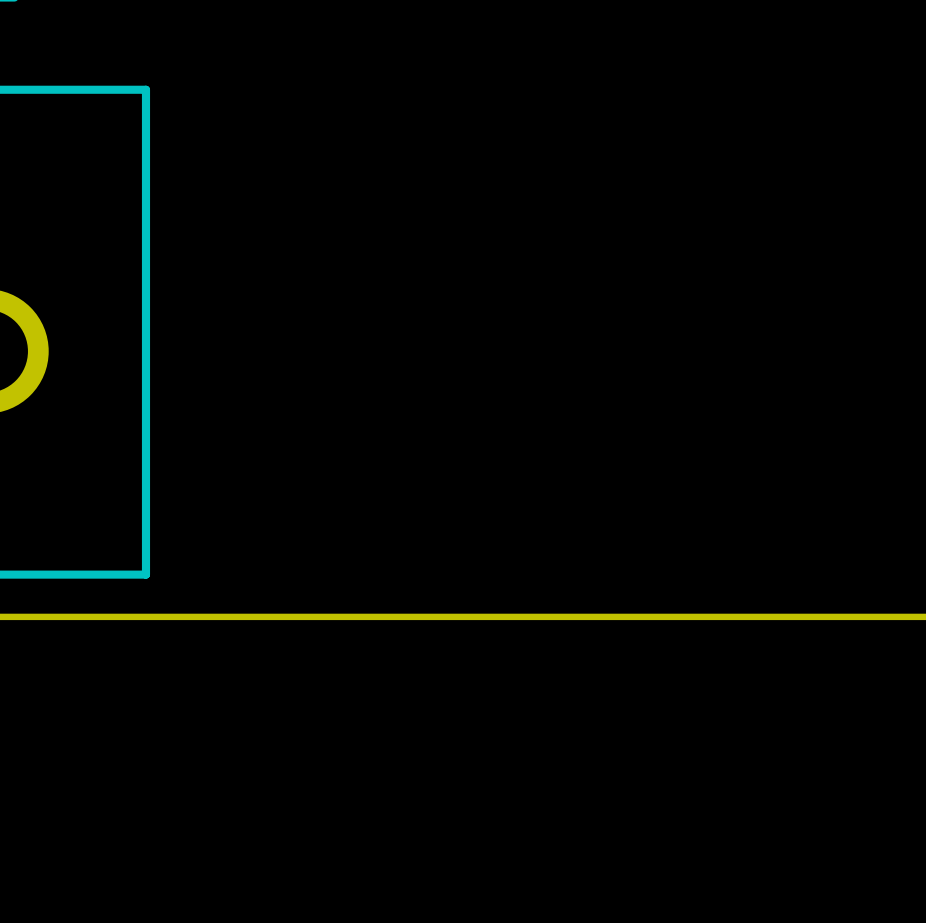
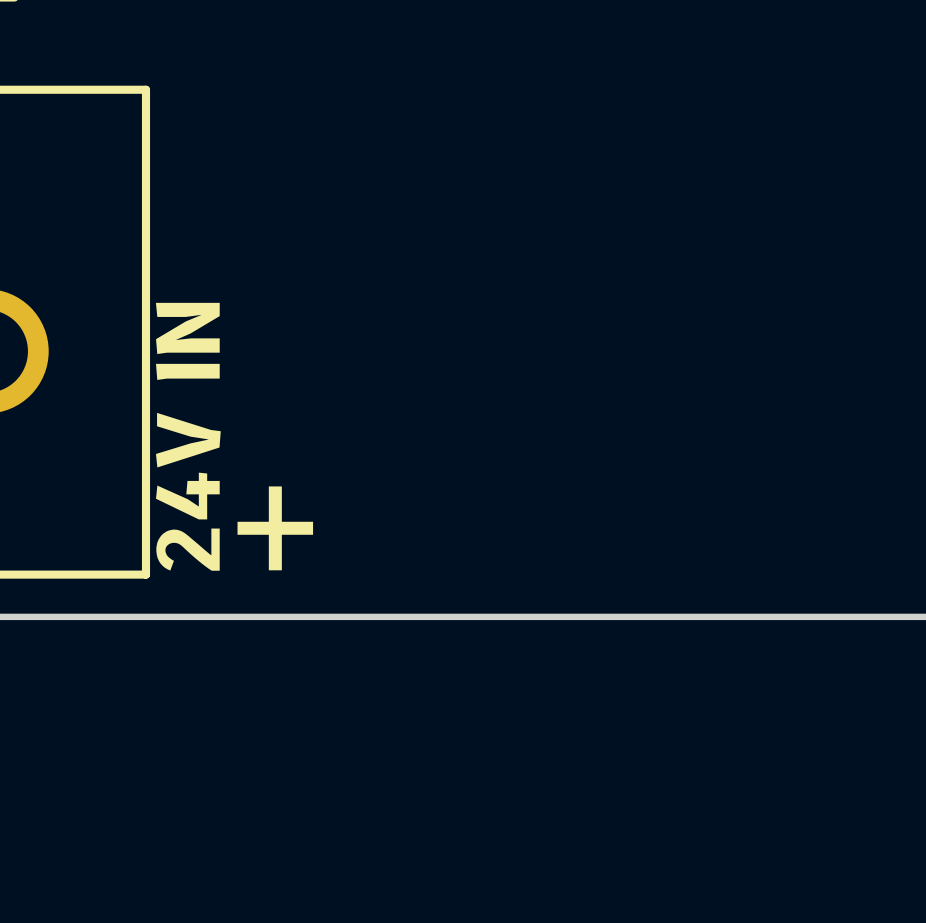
text: none -> 24V IN (188, 436)
text: none -> + (275, 528)

